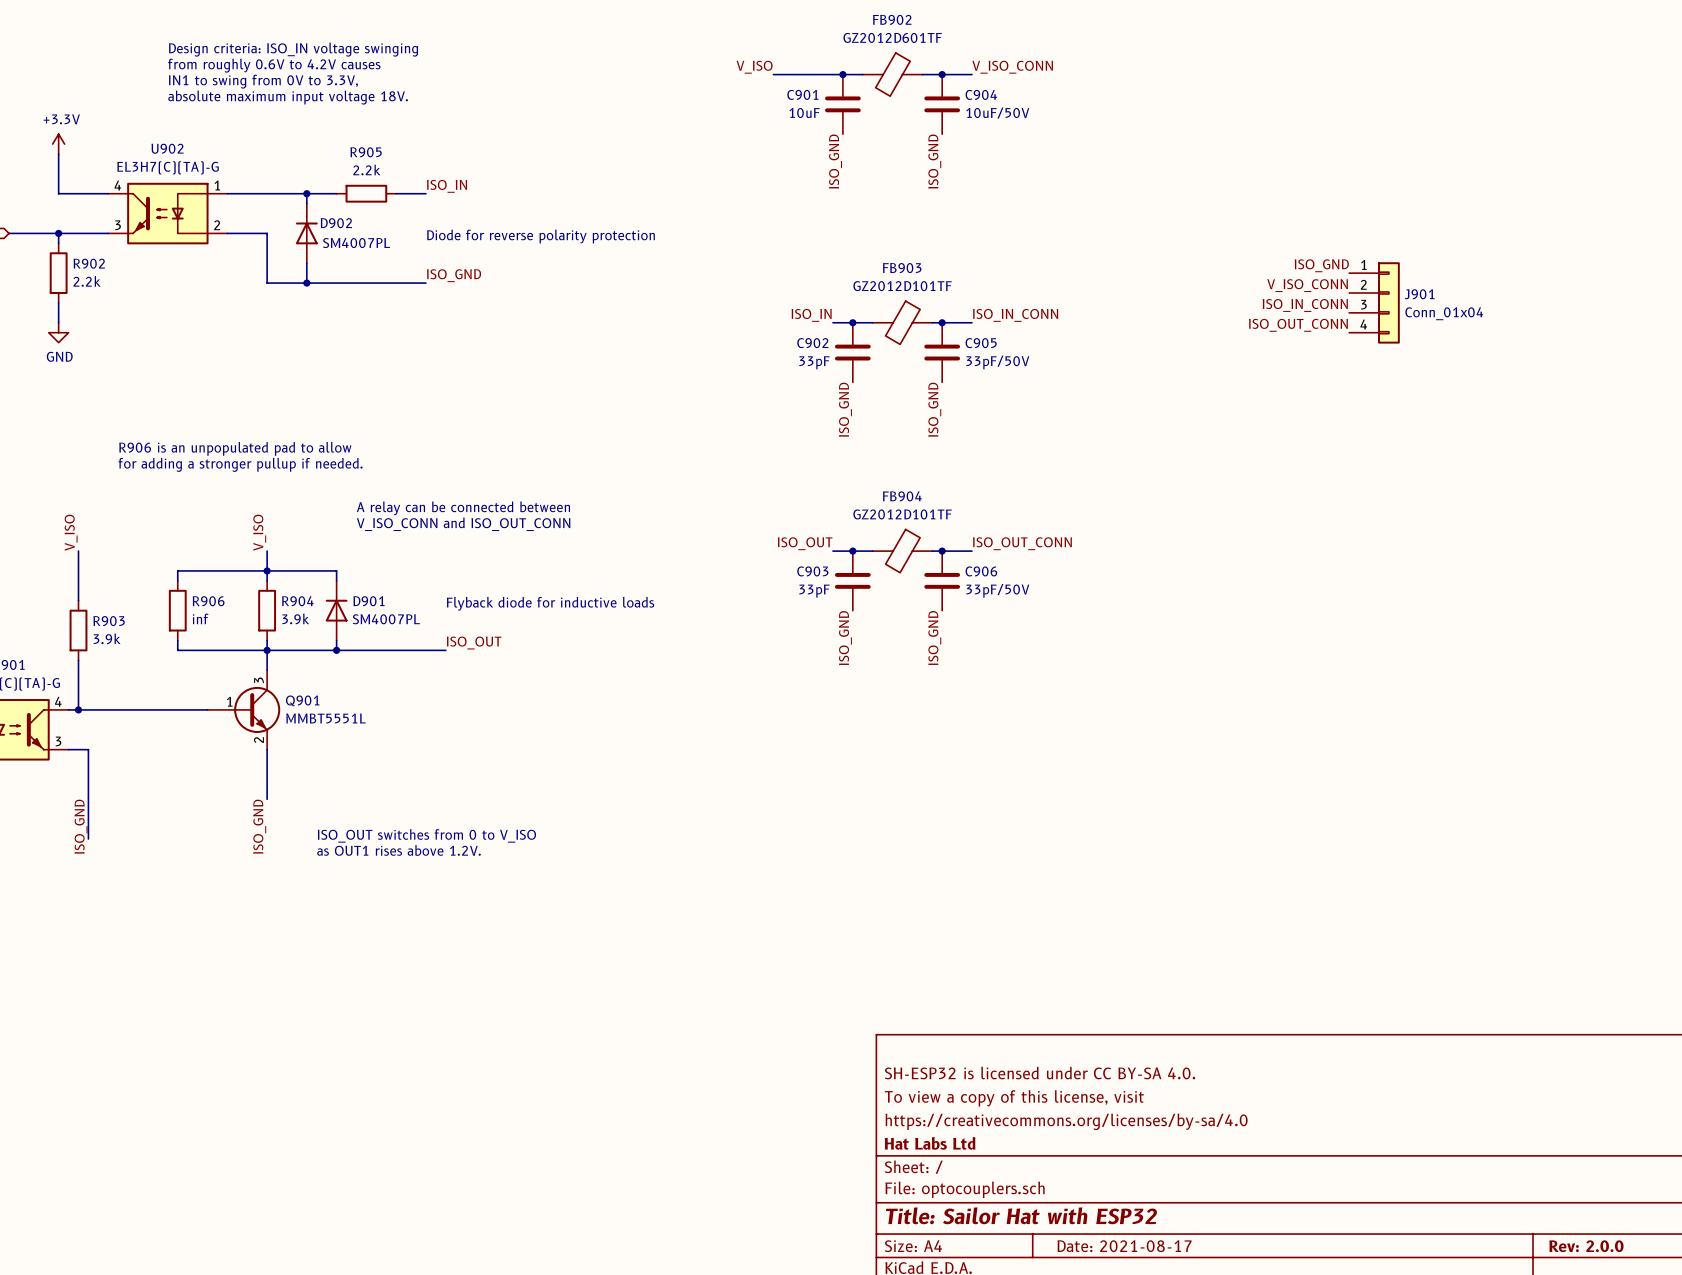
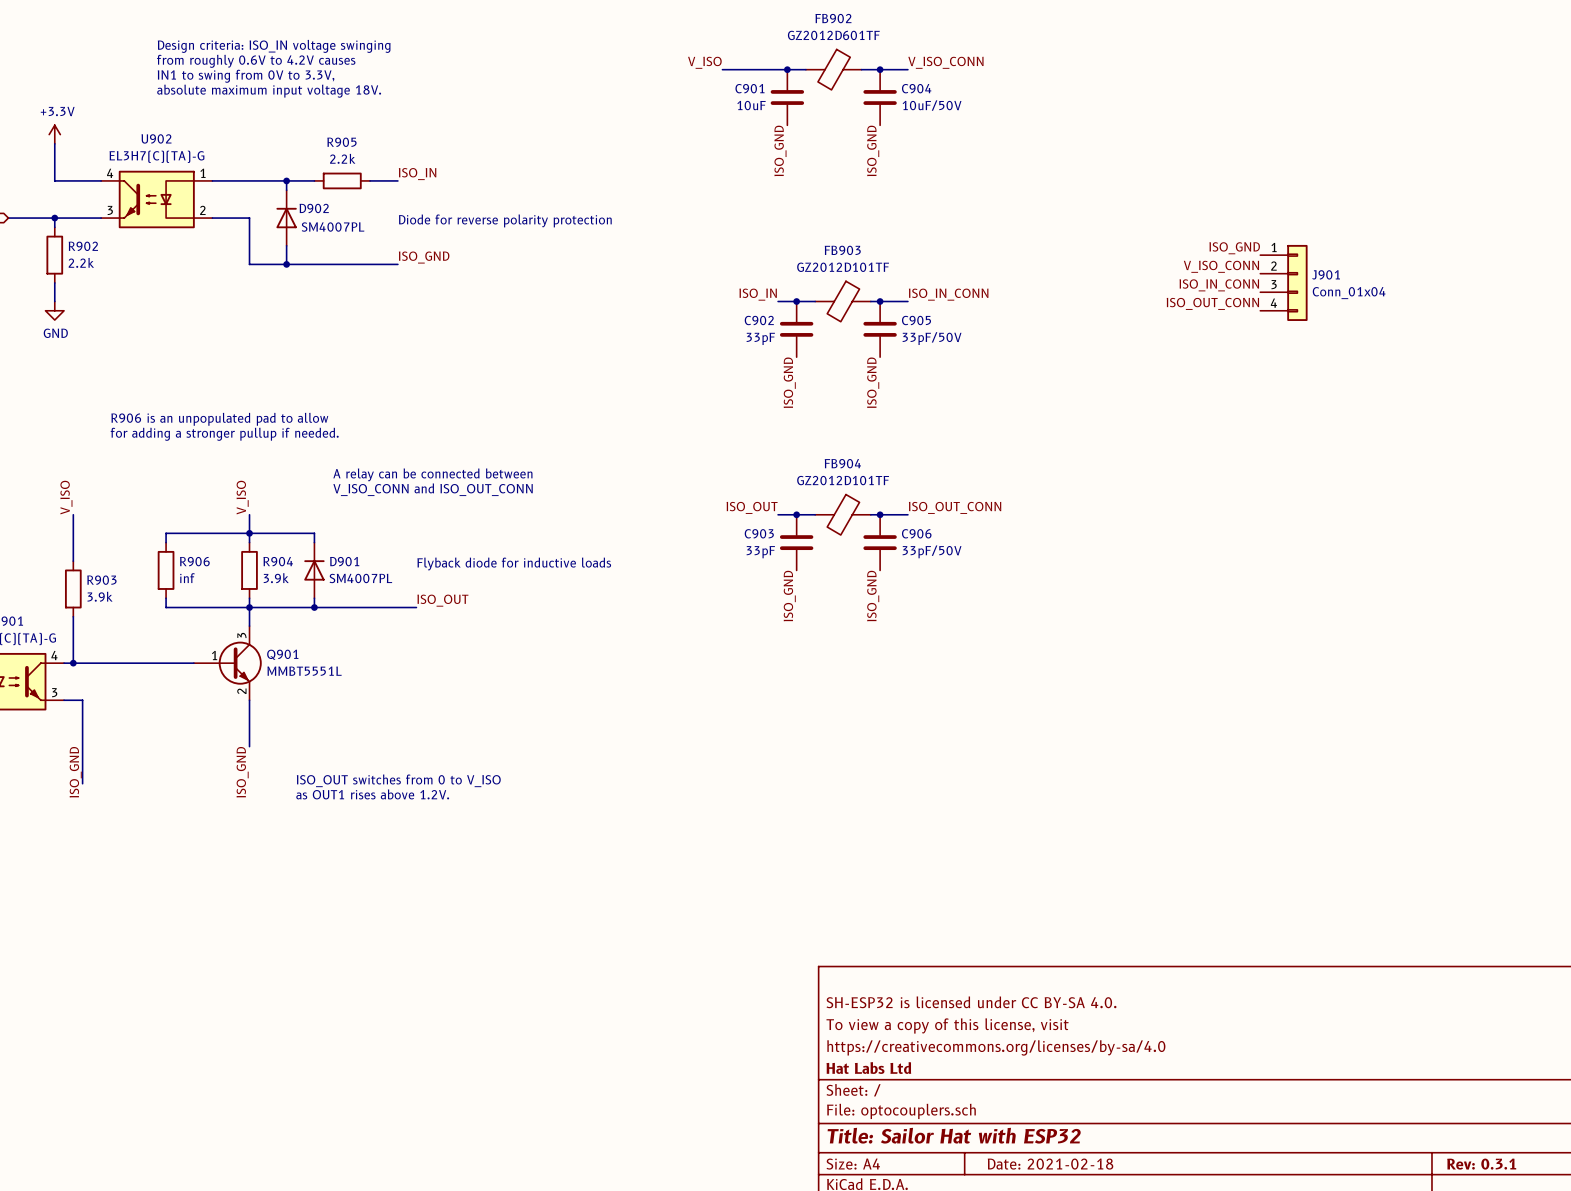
title block: Date: 2021-08-17 (1124, 1246) -> Date: 2021-02-18 (1050, 1164)
title block: Rev: 2.0.0 (1586, 1246) -> Rev: 0.3.1 (1481, 1164)

